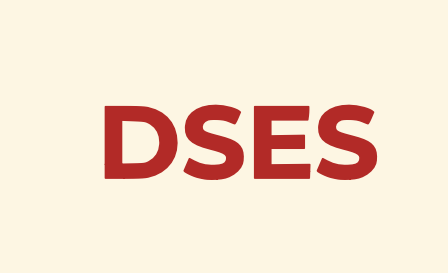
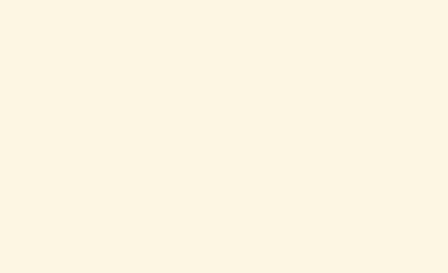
part: (240, 142) -> none

